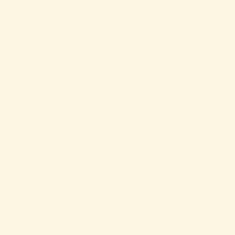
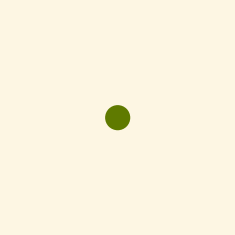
junction: none -> (117, 117)

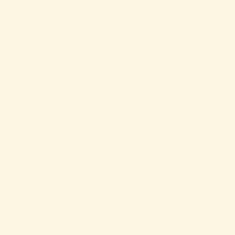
junction: (117, 117) -> none

